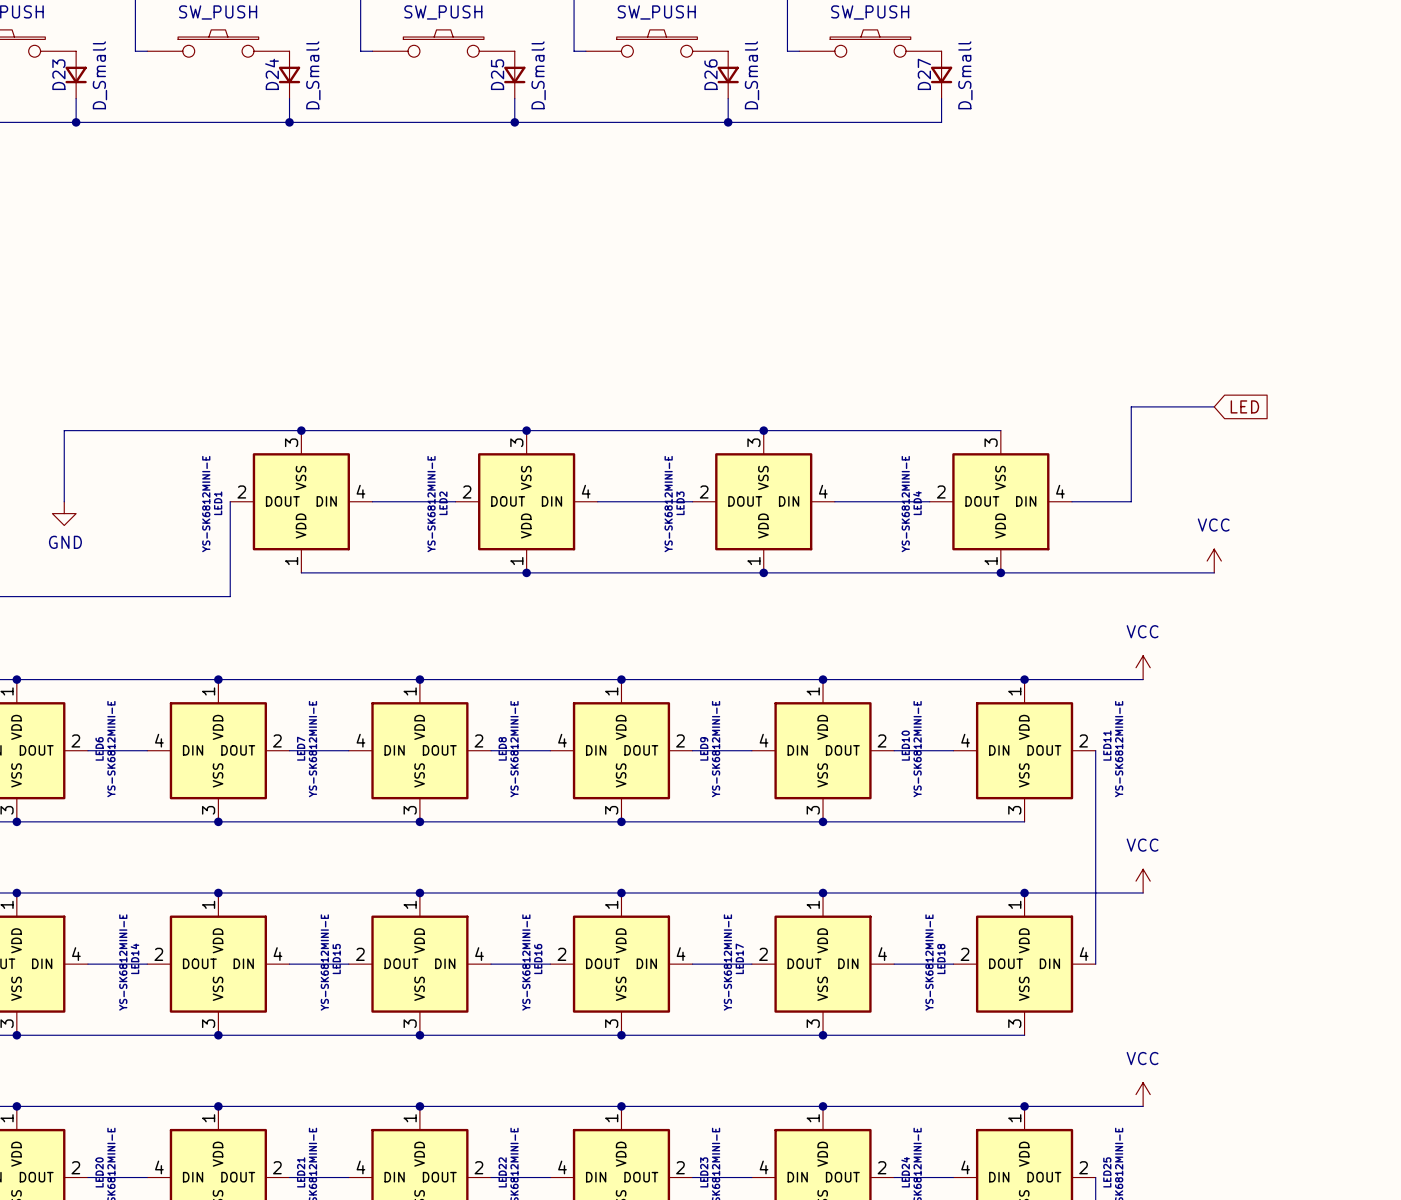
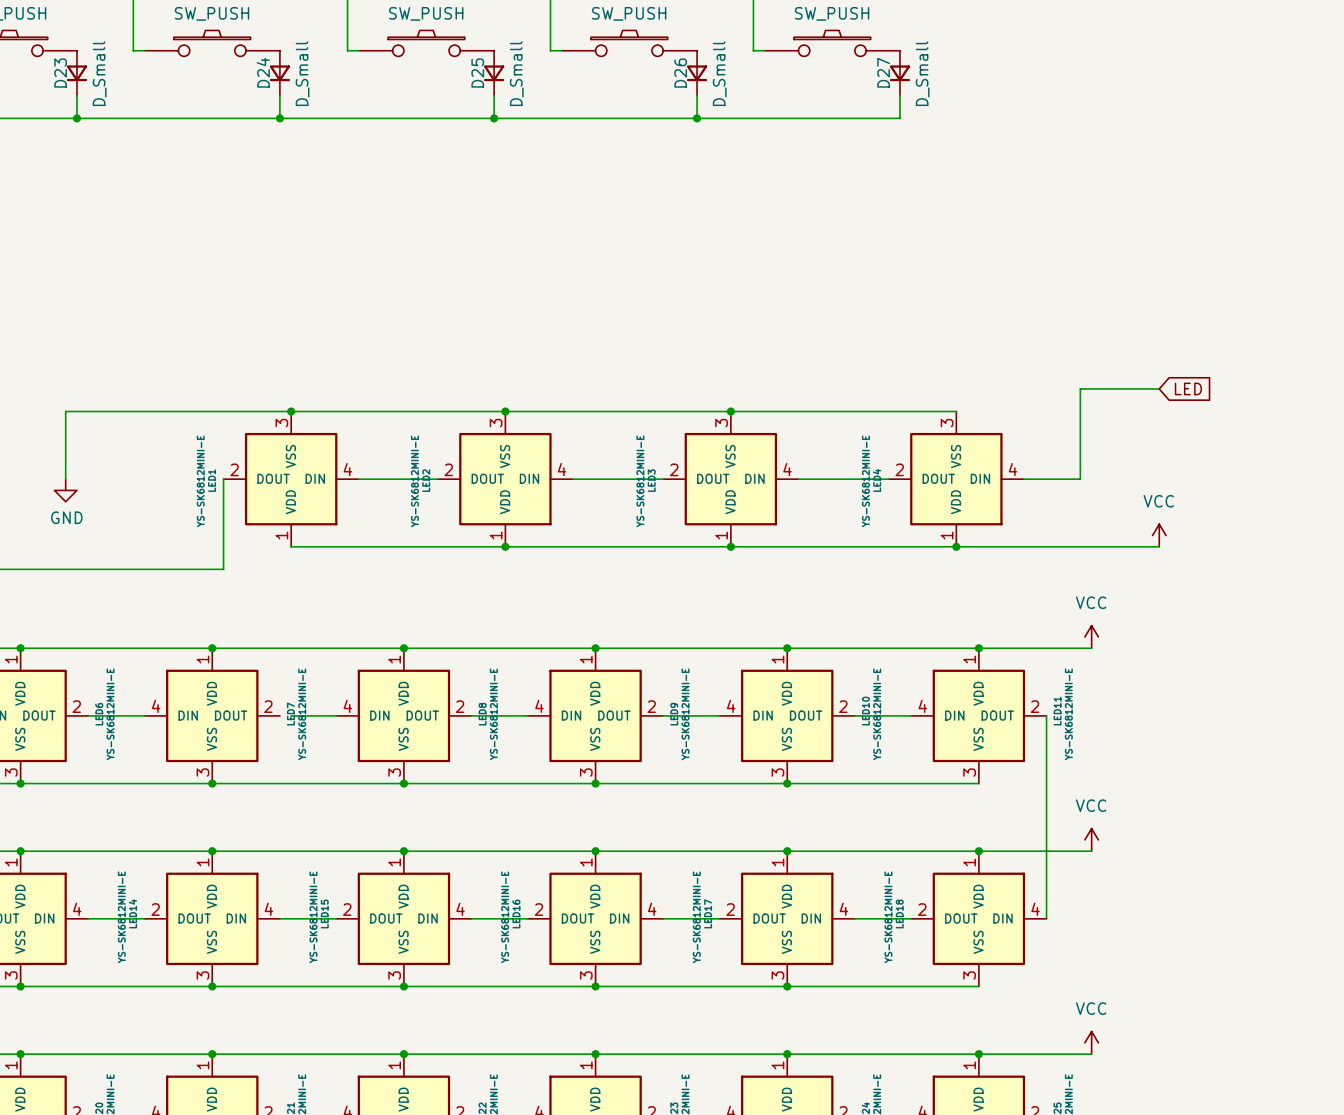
wire: (289, 750) (301, 750) -> none

